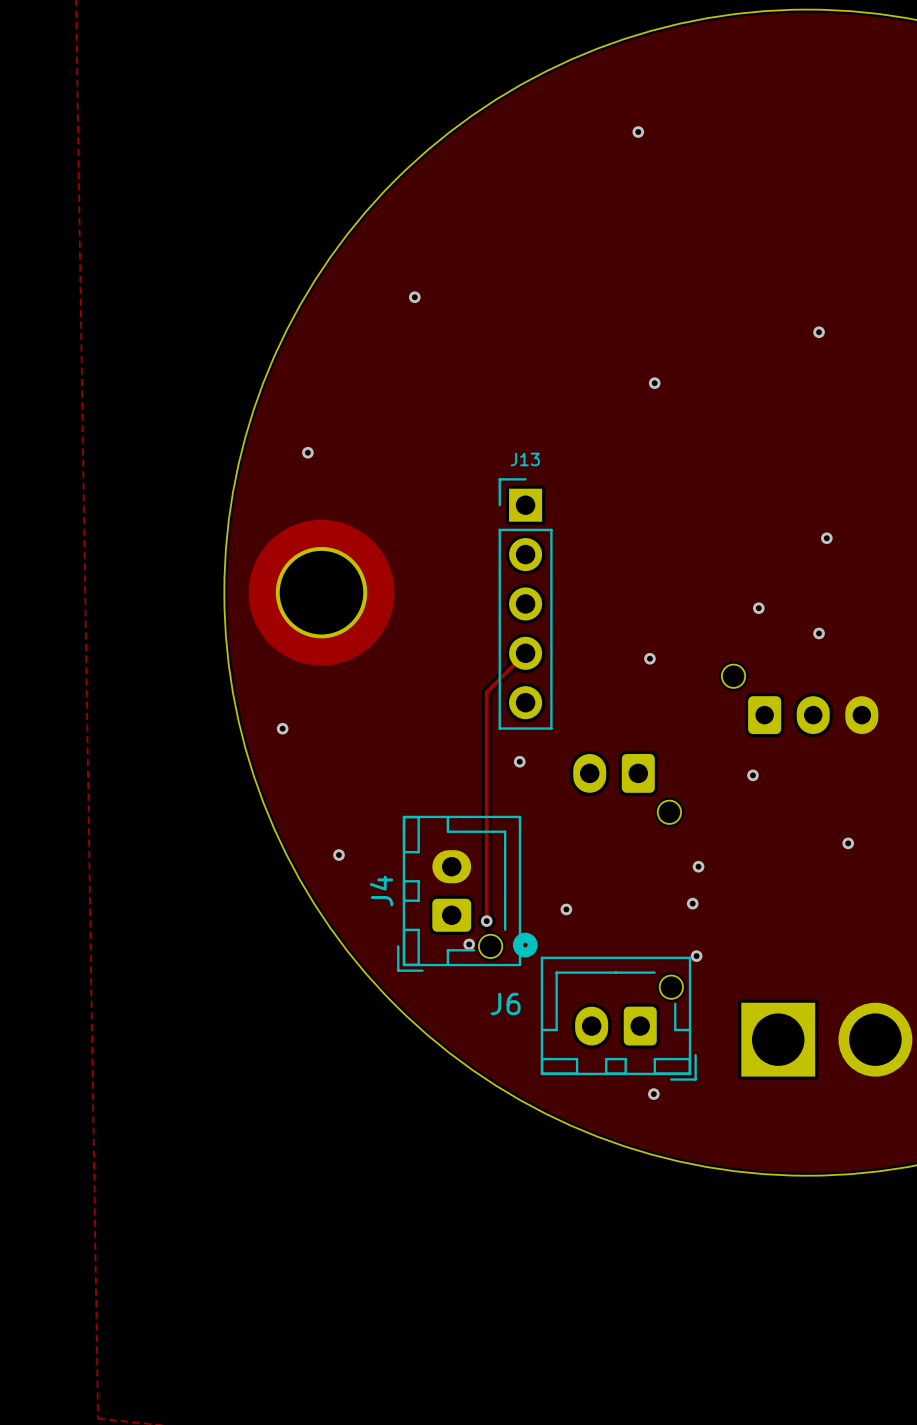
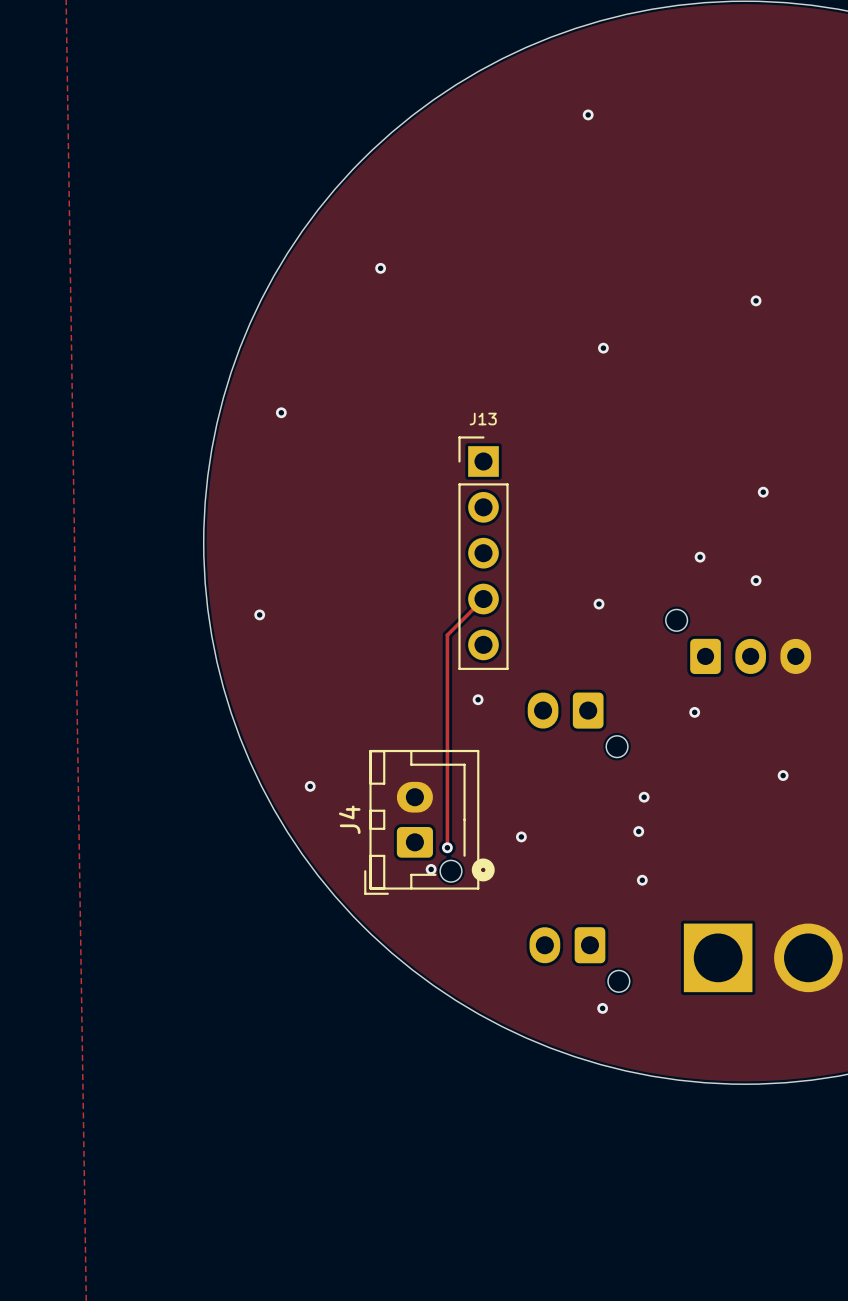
part: (321, 592) -> none
via position: (282, 728) -> (259, 614)
J6 side: top (618, 1018) -> bottom (579, 959)

